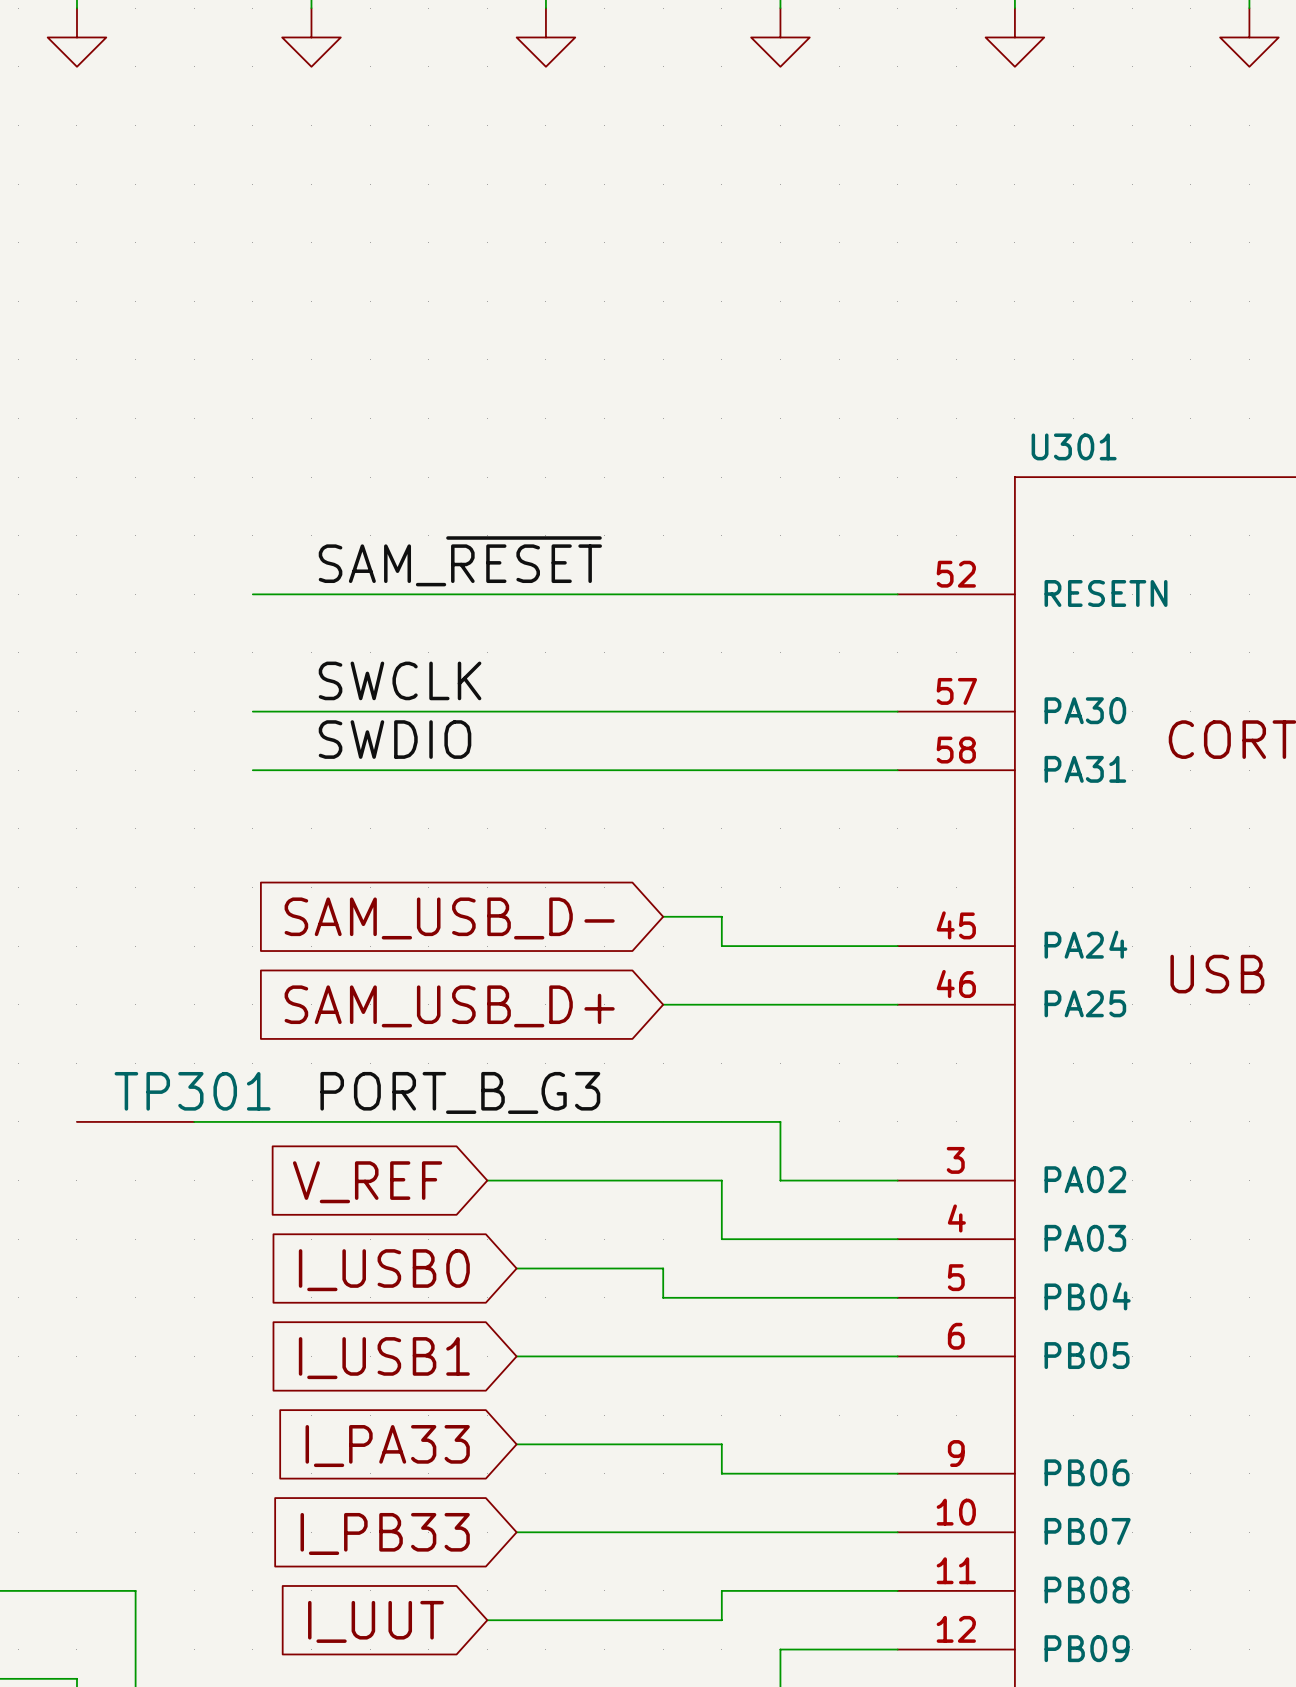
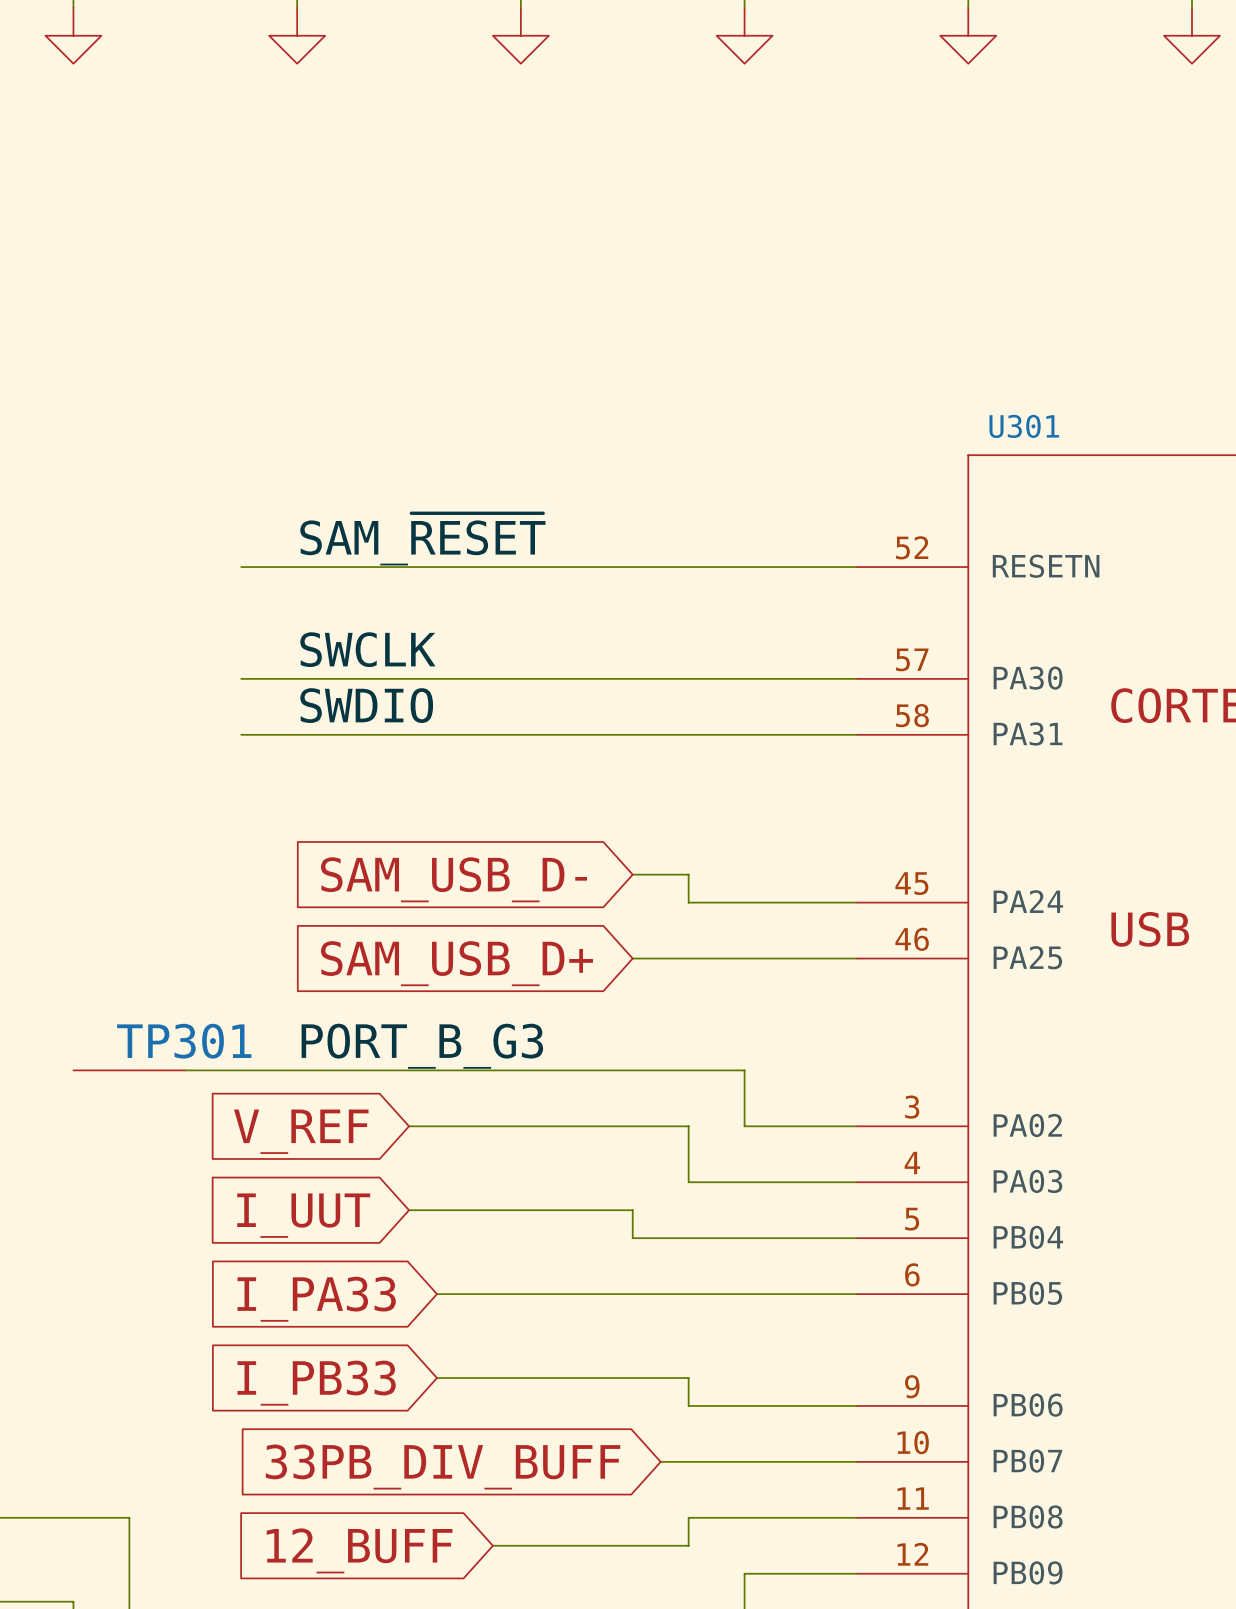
wire: none -> (409, 1126) (464, 1126)
global label position: V_REF (367, 1182) -> V_REF (301, 1131)
wire: none -> (409, 1210) (492, 1210)
global label: I_USB0 (384, 1270) -> none
wire: none -> (436, 1294) (492, 1294)
global label: I_USB1 (384, 1358) -> none
wire: none -> (436, 1377) (492, 1377)
global label position: I_PA33 (387, 1446) -> I_PA33 (316, 1299)
wire: (516, 1532) (692, 1532) -> none
global label position: I_PB33 (385, 1533) -> I_PB33 (316, 1383)
global label: none -> 33PB_DIV_BUFF (443, 1467)
wire: (487, 1620) (516, 1620) -> none
global label: none -> 12_BUFF (359, 1550)
global label position: I_UUT (375, 1621) -> I_UUT (303, 1215)

